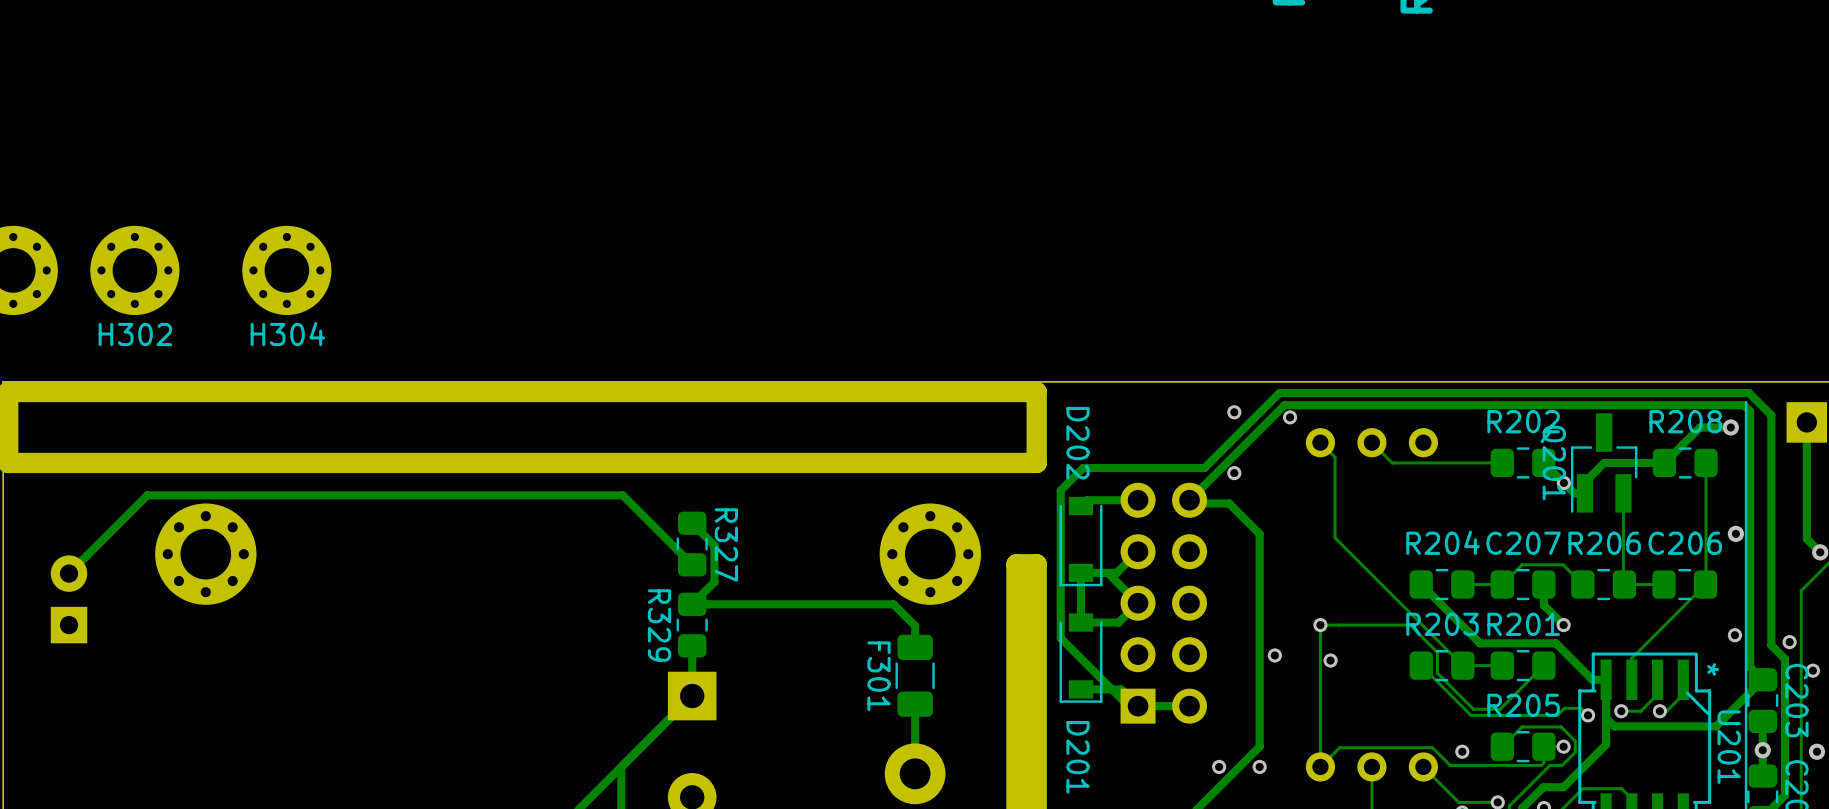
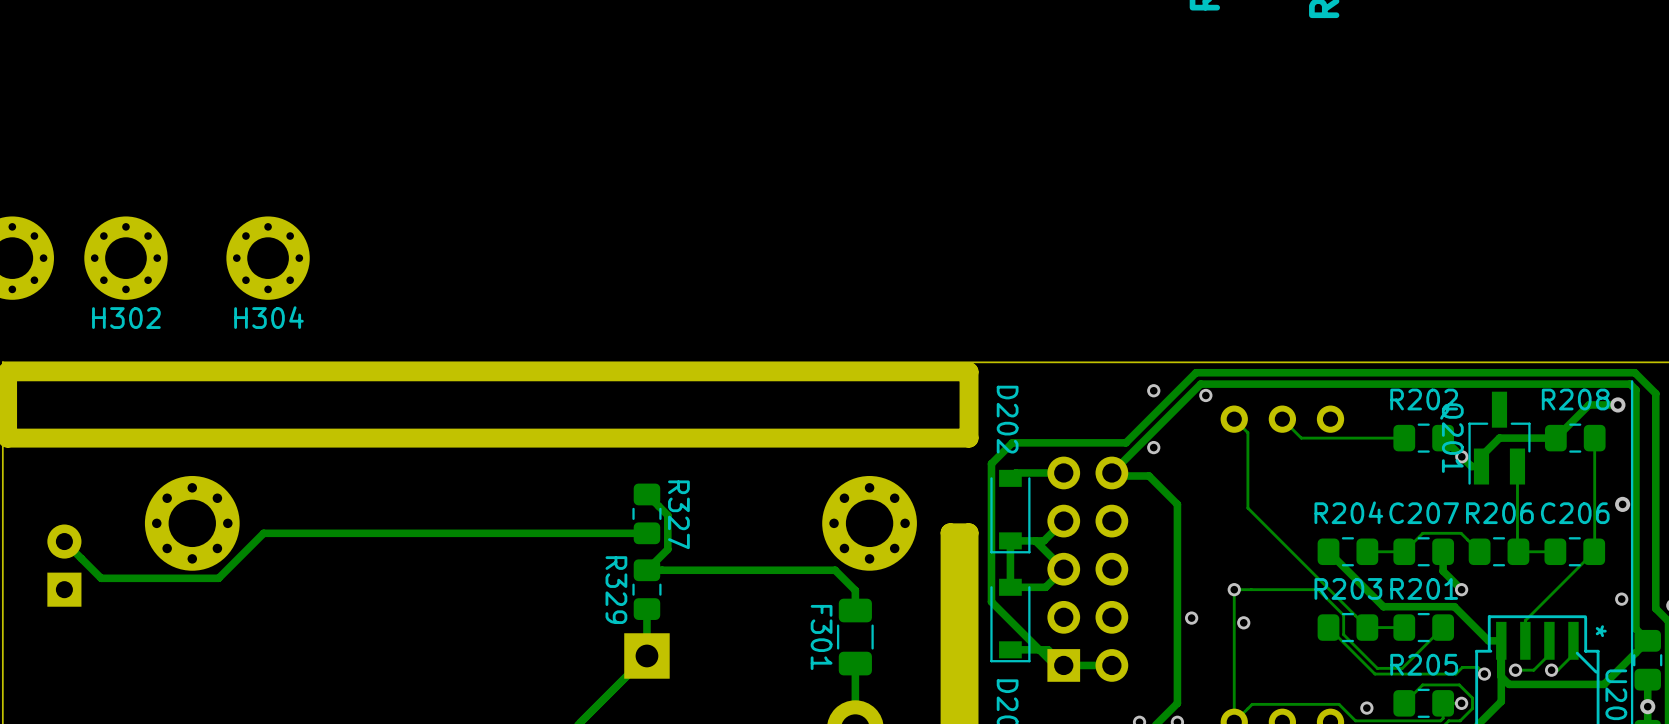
track: (692, 564) (622, 495) (147, 495) (69, 573) -> (646, 533) (263, 533) (218, 578) (101, 578) (64, 541)

